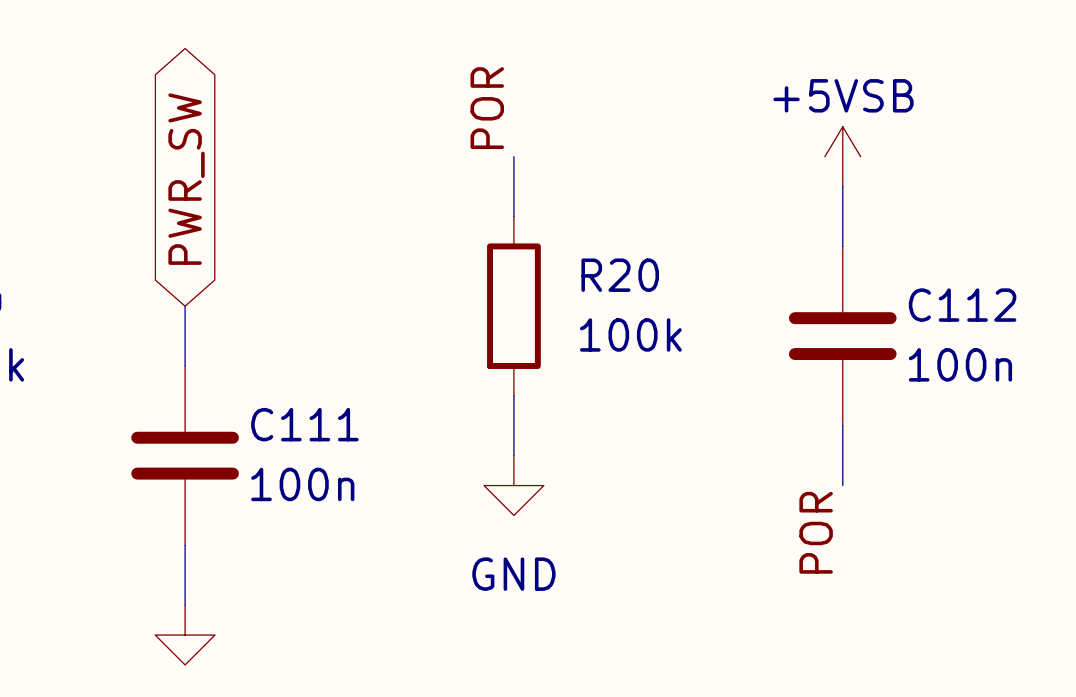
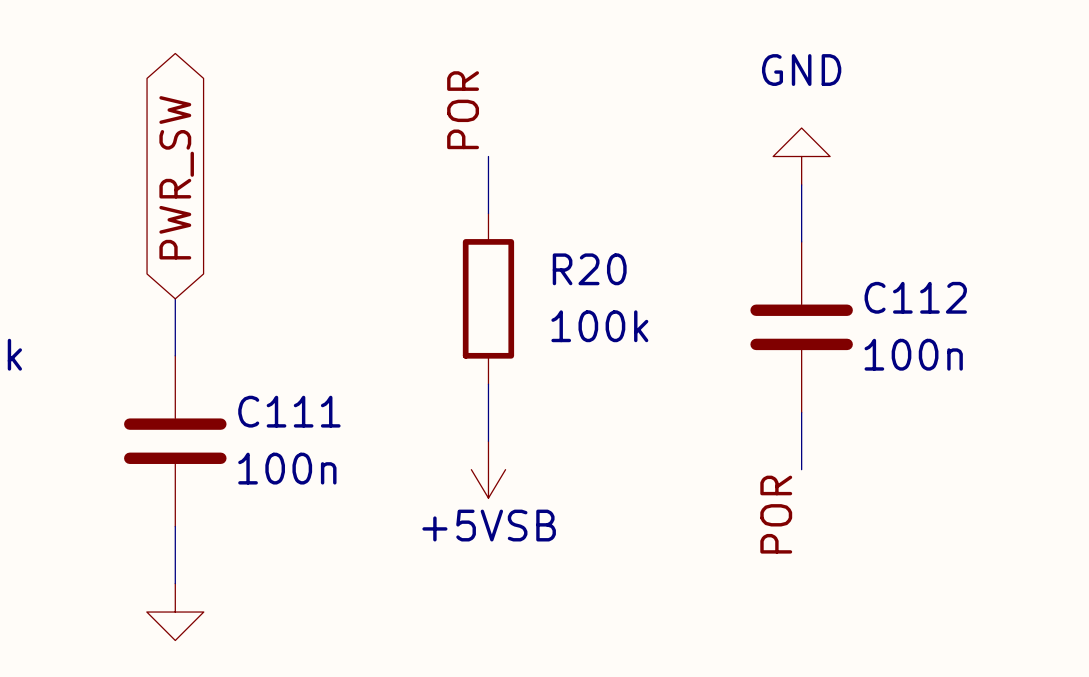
power symbol: +5VSB (842, 156) -> GND (801, 156)
power symbol: GND (513, 485) -> +5VSB (488, 469)

